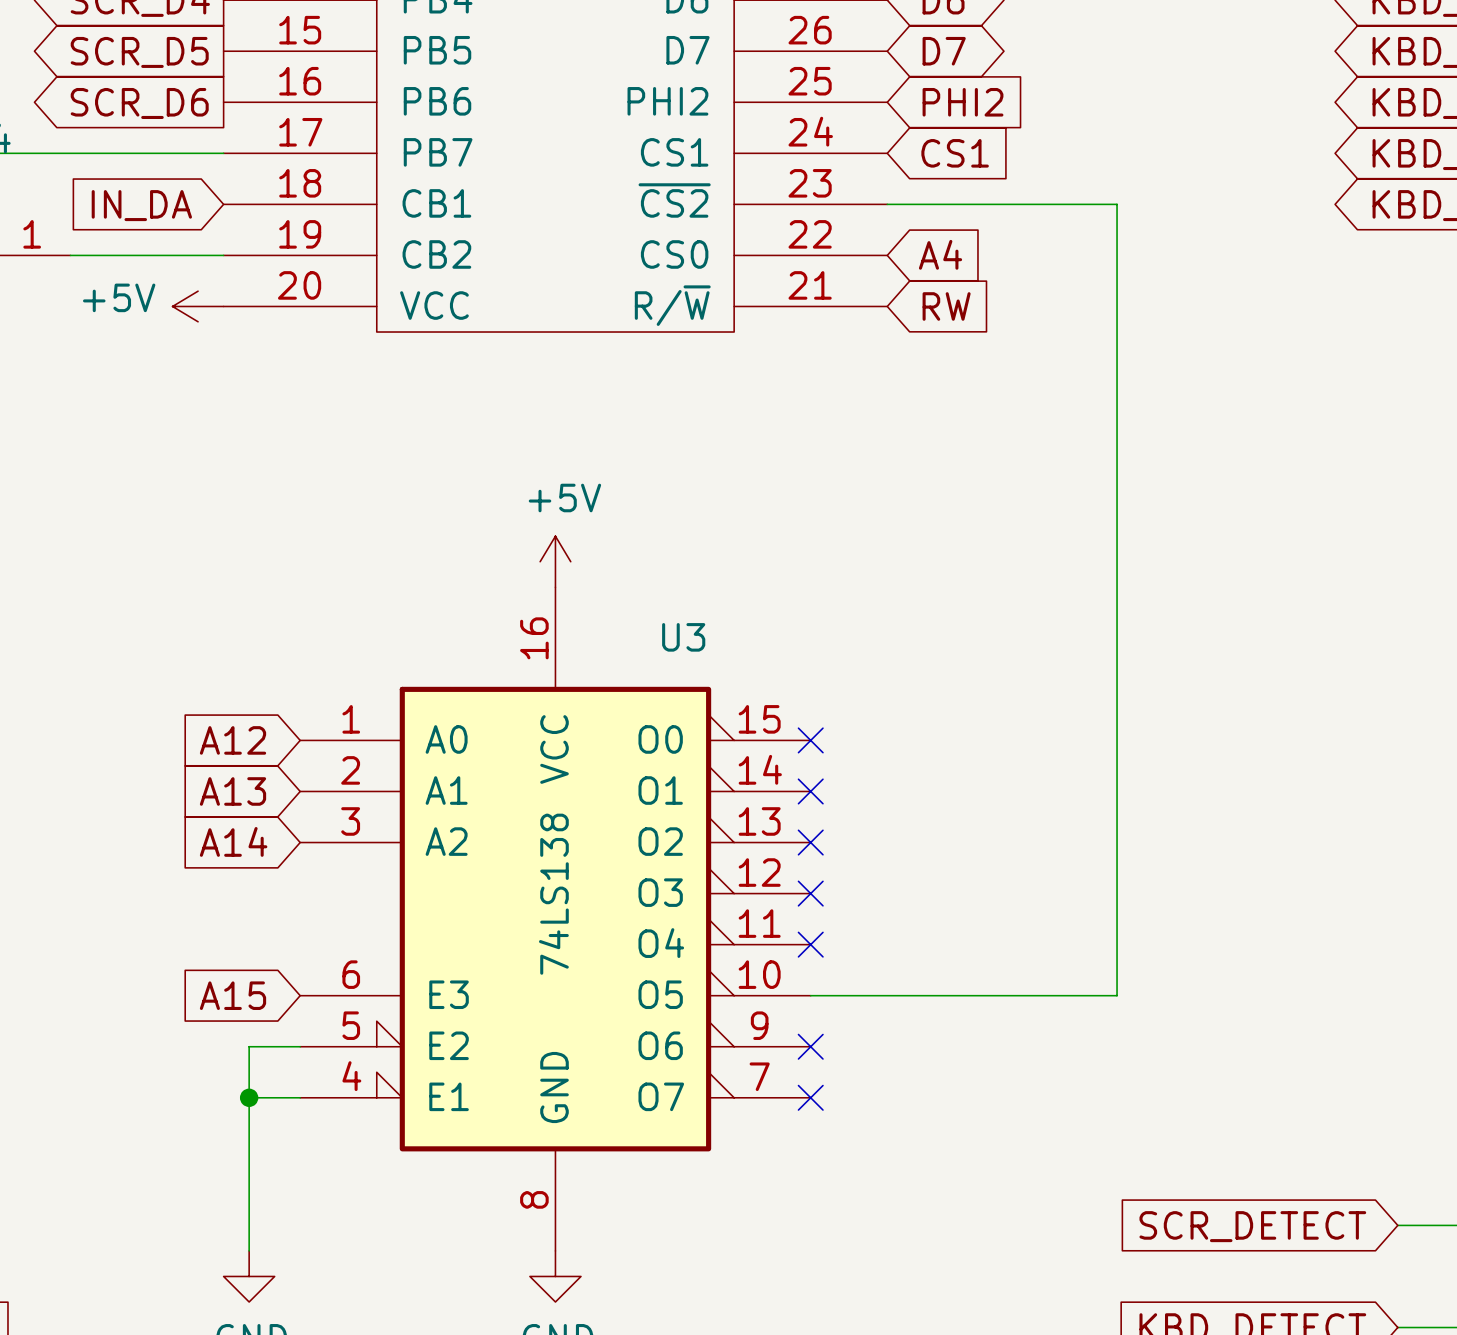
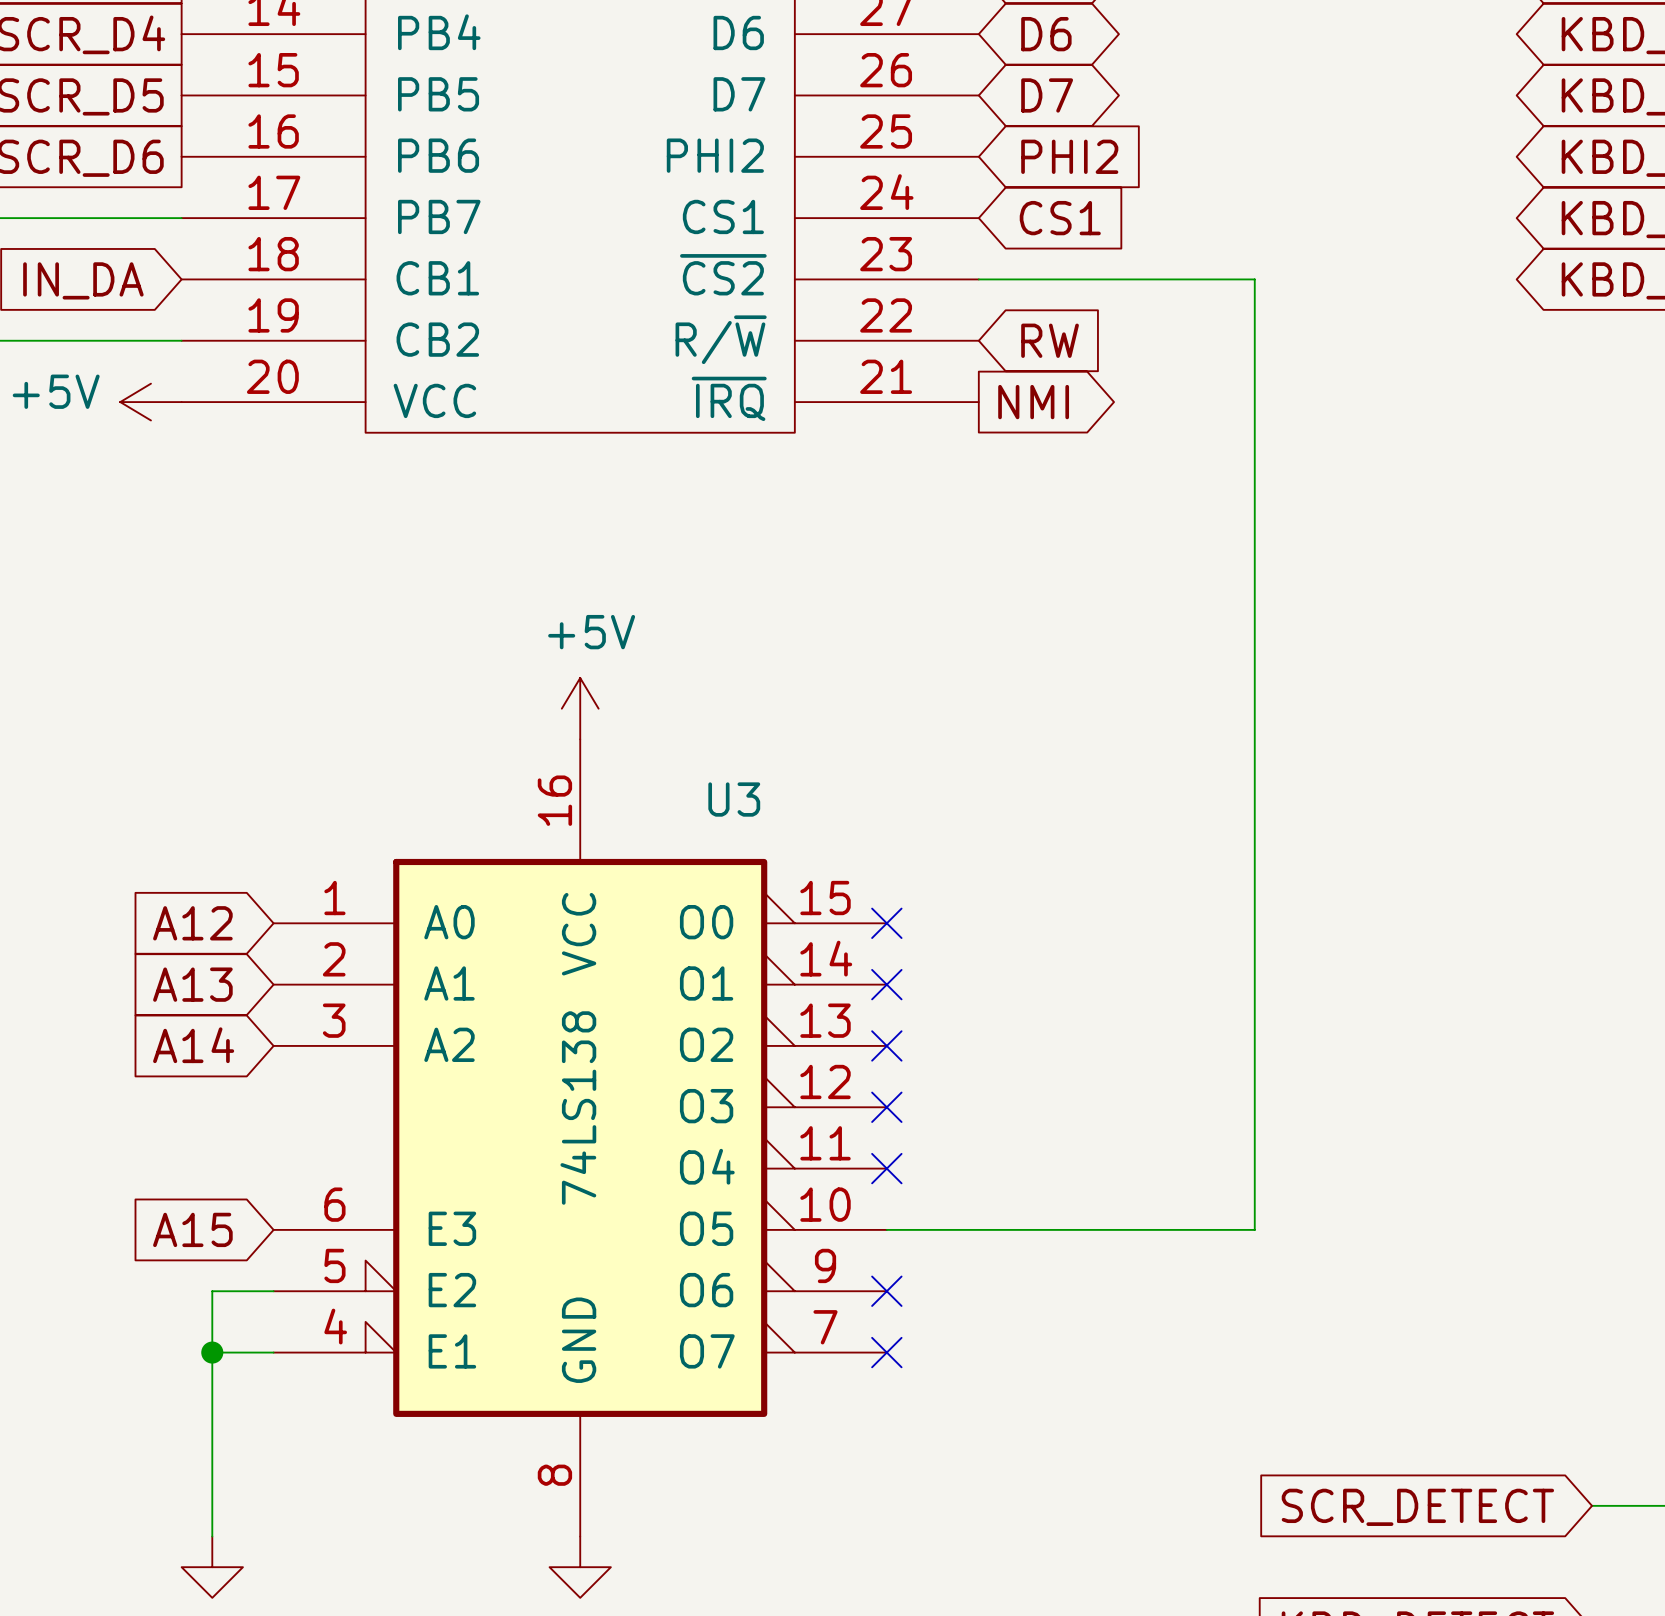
part pin name: CS0 (674, 254) -> R/~{W} (721, 339)
global label: A4 (940, 254) -> RW (1050, 340)
part pin name: R/~{W} (672, 305) -> ~{IRQ} (729, 398)
global label shape: input (946, 306) -> output (1033, 402)
global label: RW (946, 306) -> NMI (1033, 402)

